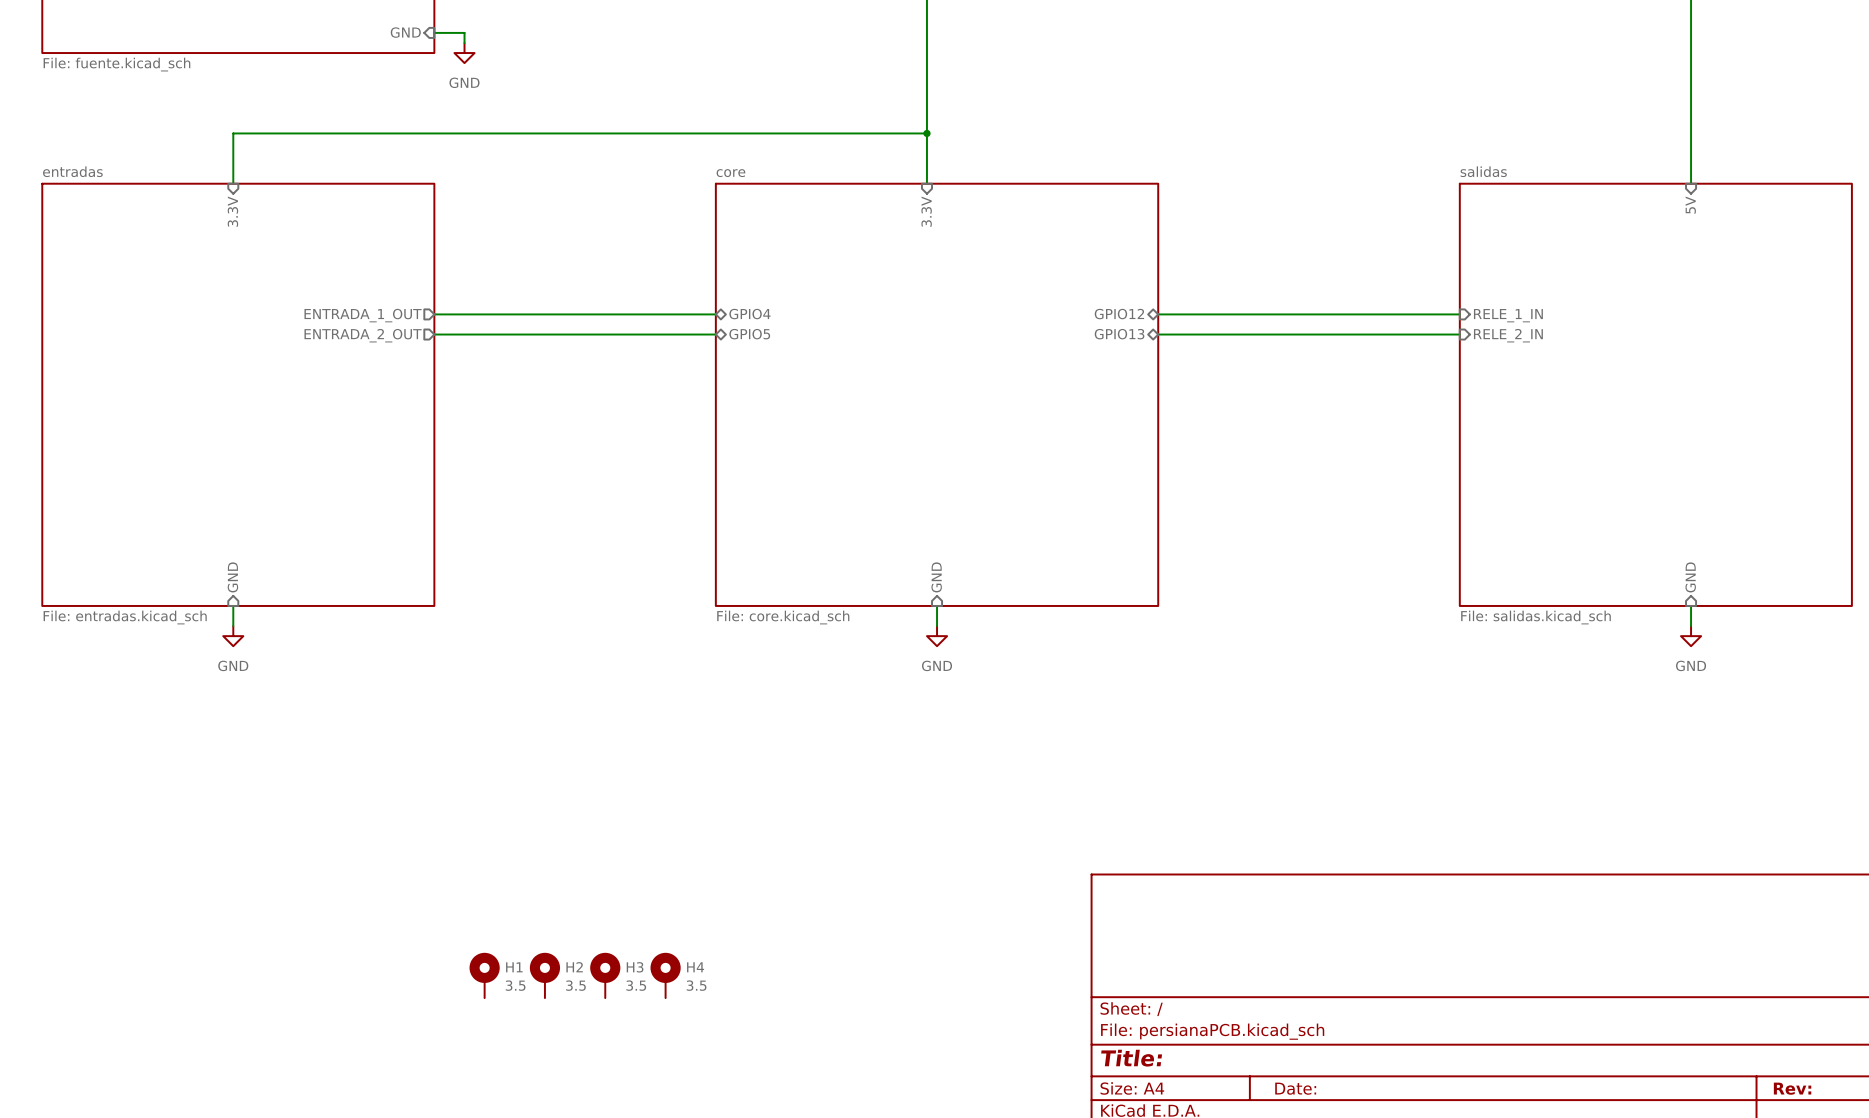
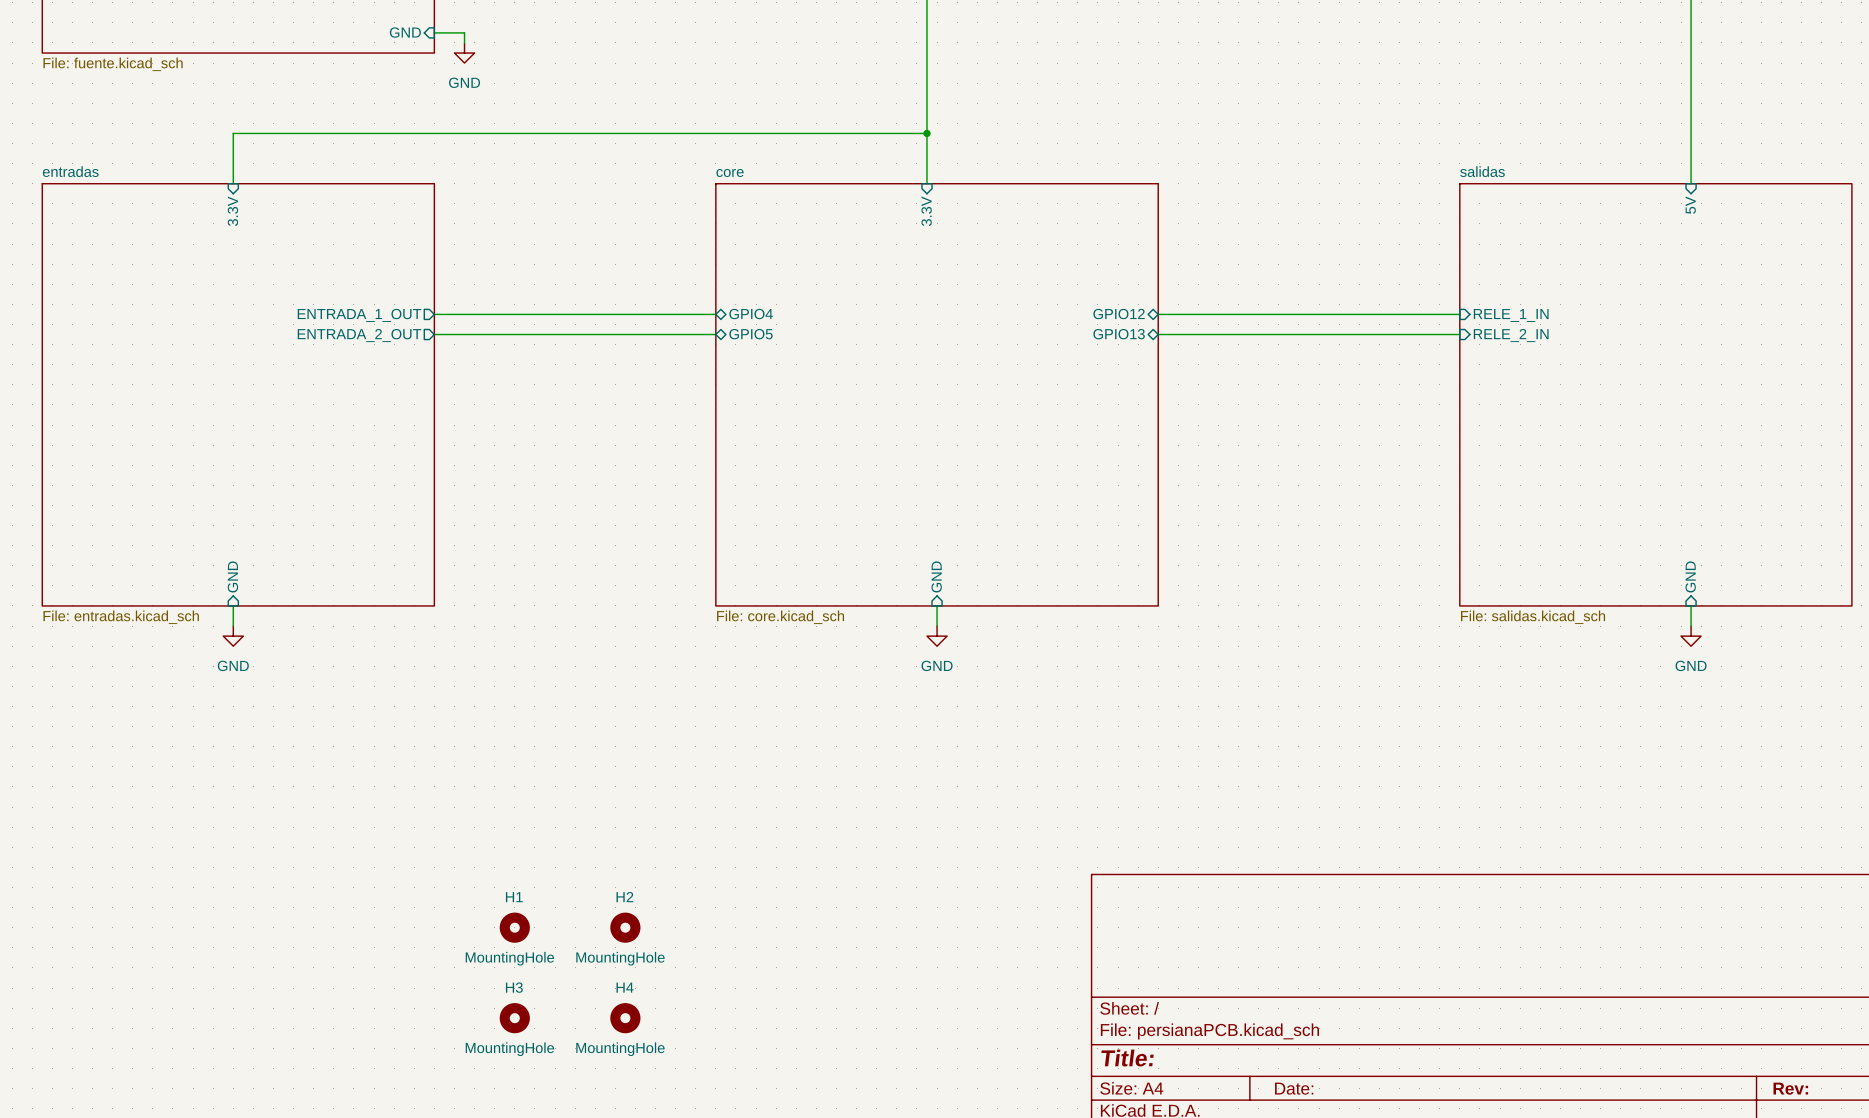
H1 symbol: [469, 952, 500, 999] -> [499, 912, 530, 943]
H2 symbol: [529, 952, 561, 999] -> [610, 912, 641, 943]
H3 symbol: [590, 952, 621, 999] -> [499, 1003, 530, 1034]
H4 symbol: [650, 952, 681, 999] -> [610, 1003, 641, 1034]
H1 name position: H1 (514, 967) -> H1 (514, 897)
H2 name position: H2 (574, 967) -> H2 (624, 897)
H3 name position: H3 (635, 967) -> H3 (514, 987)
H4 name position: H4 (695, 967) -> H4 (625, 987)
H1 value: 3.5 (515, 985) -> MountingHole (509, 958)
H2 value: 3.5 (575, 985) -> MountingHole (620, 958)
H3 value: 3.5 (636, 985) -> MountingHole (509, 1049)
H4 value: 3.5 (696, 985) -> MountingHole (620, 1049)

